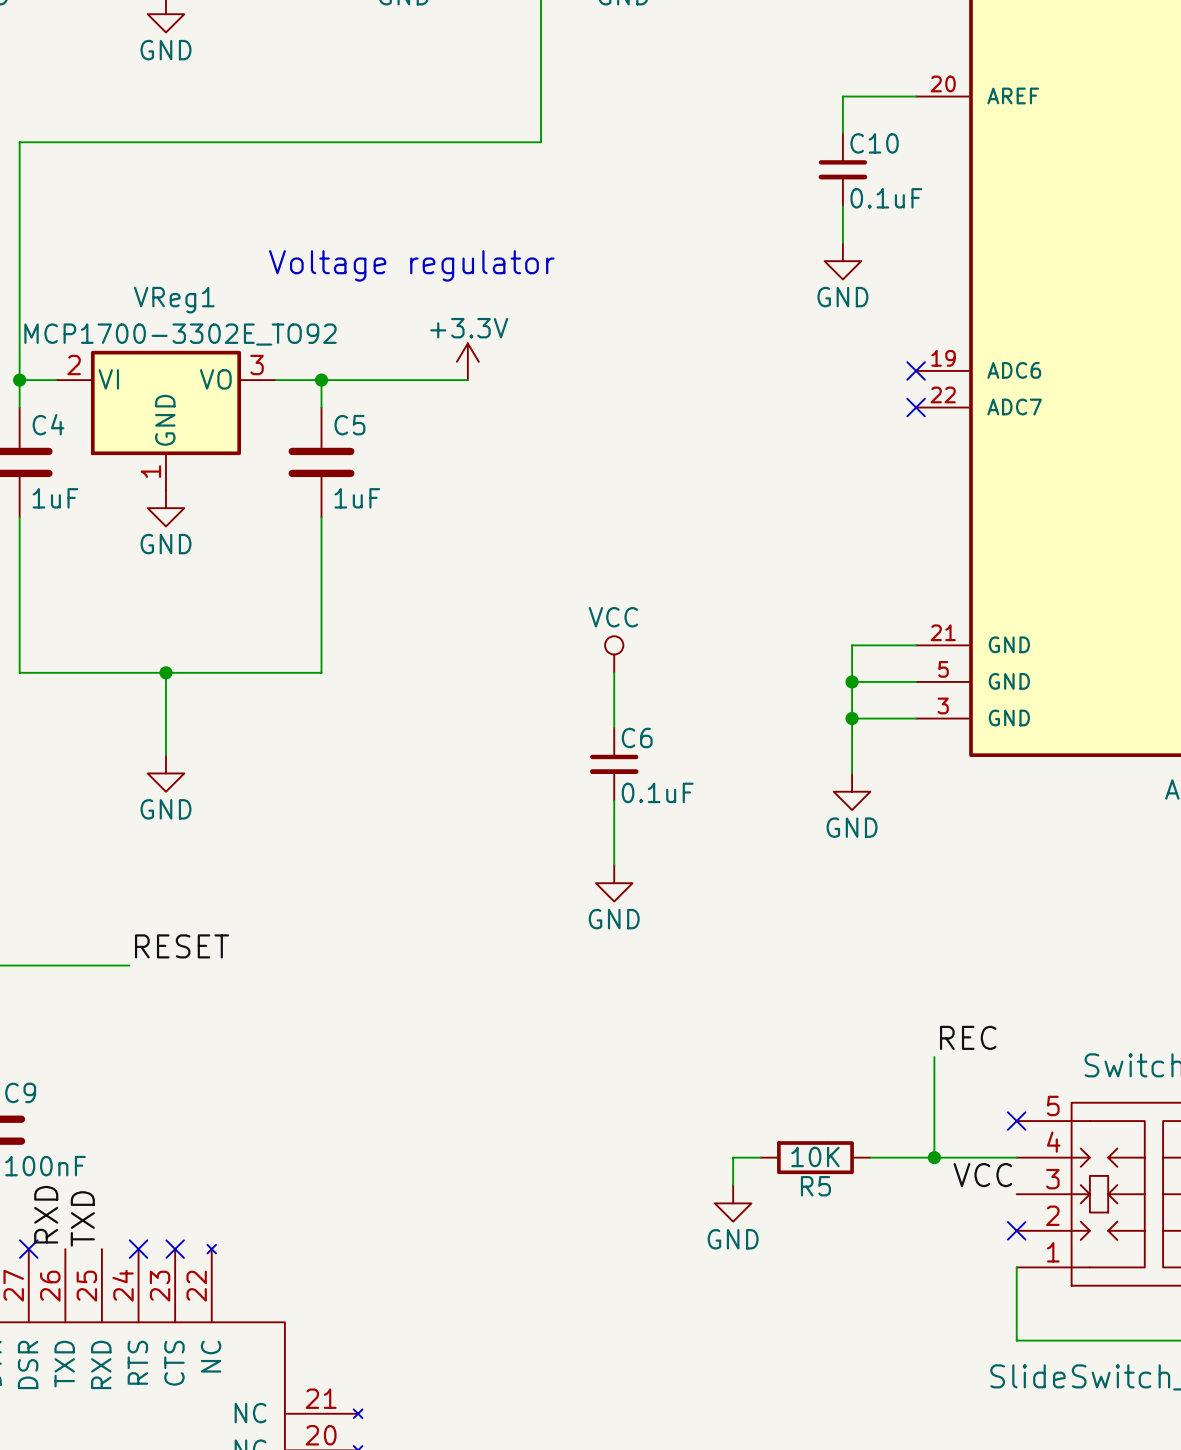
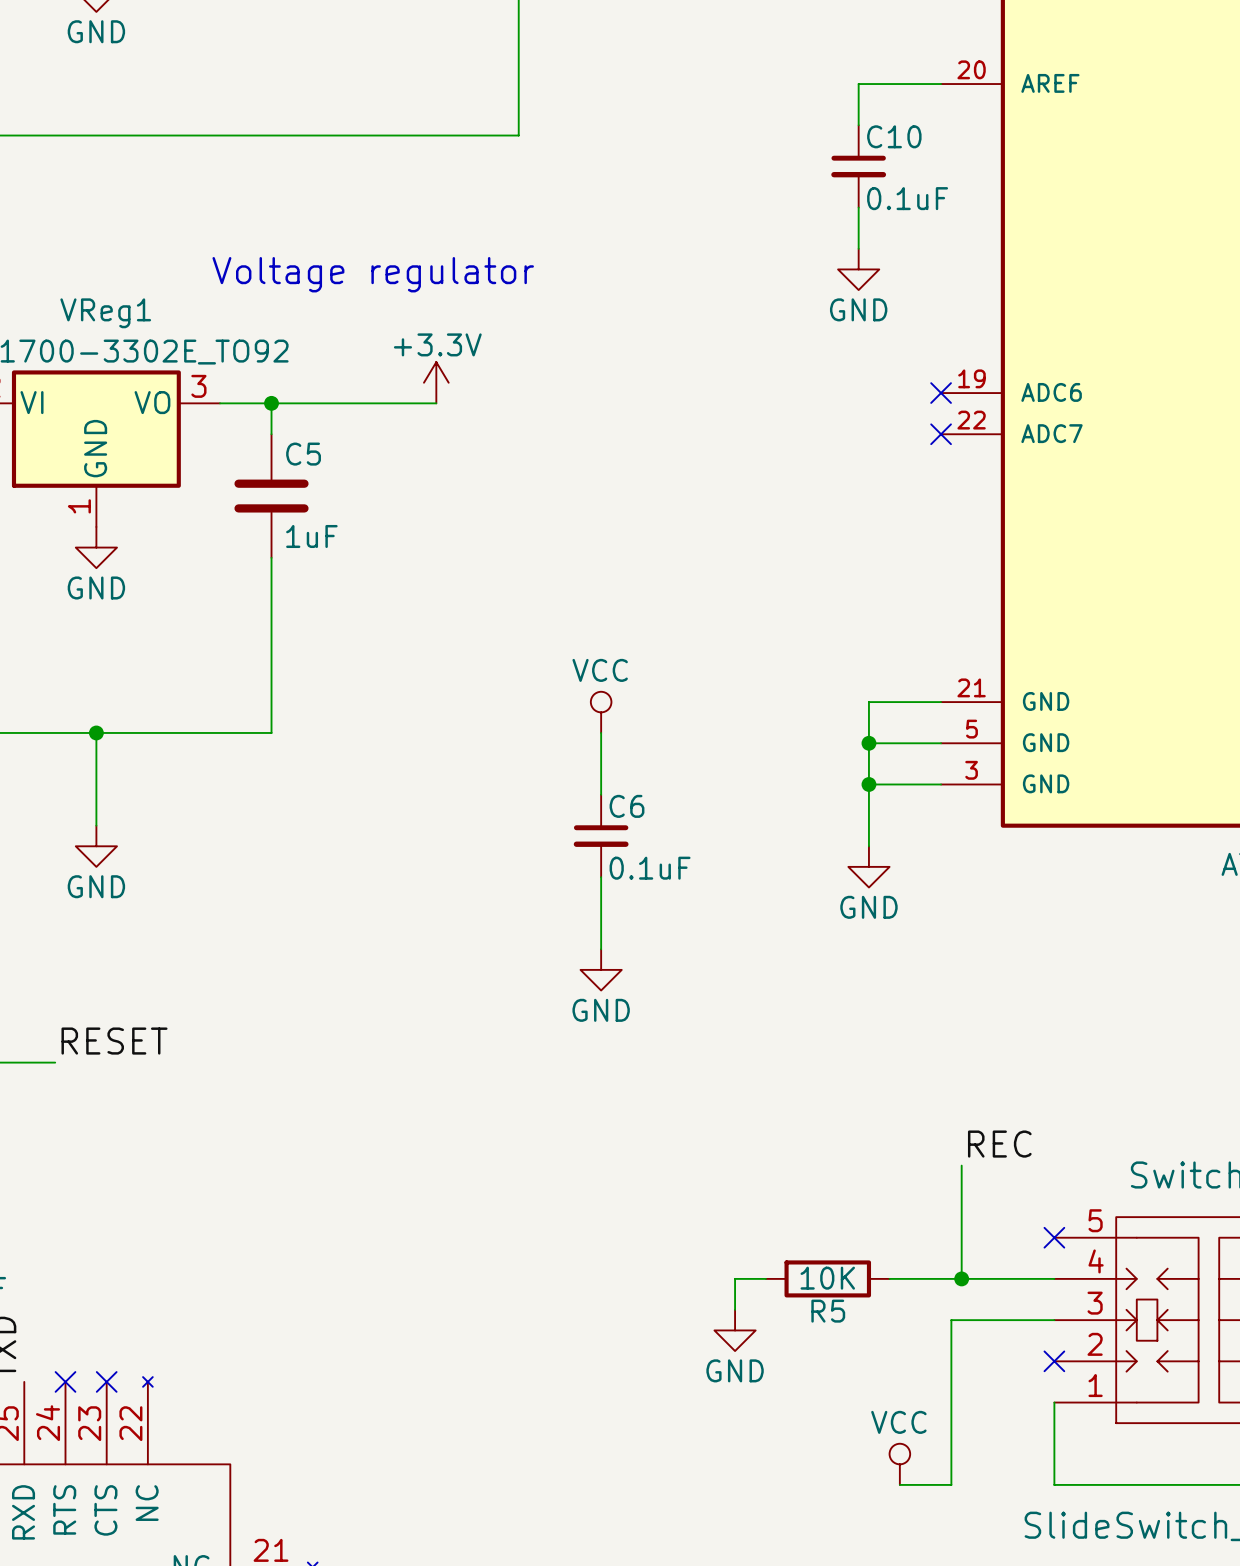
label: VCC (982, 1175) -> none
wire: none -> (1054, 1320) (951, 1320) (951, 1484) (899, 1484)
power symbol: none -> VCC (899, 1464)

